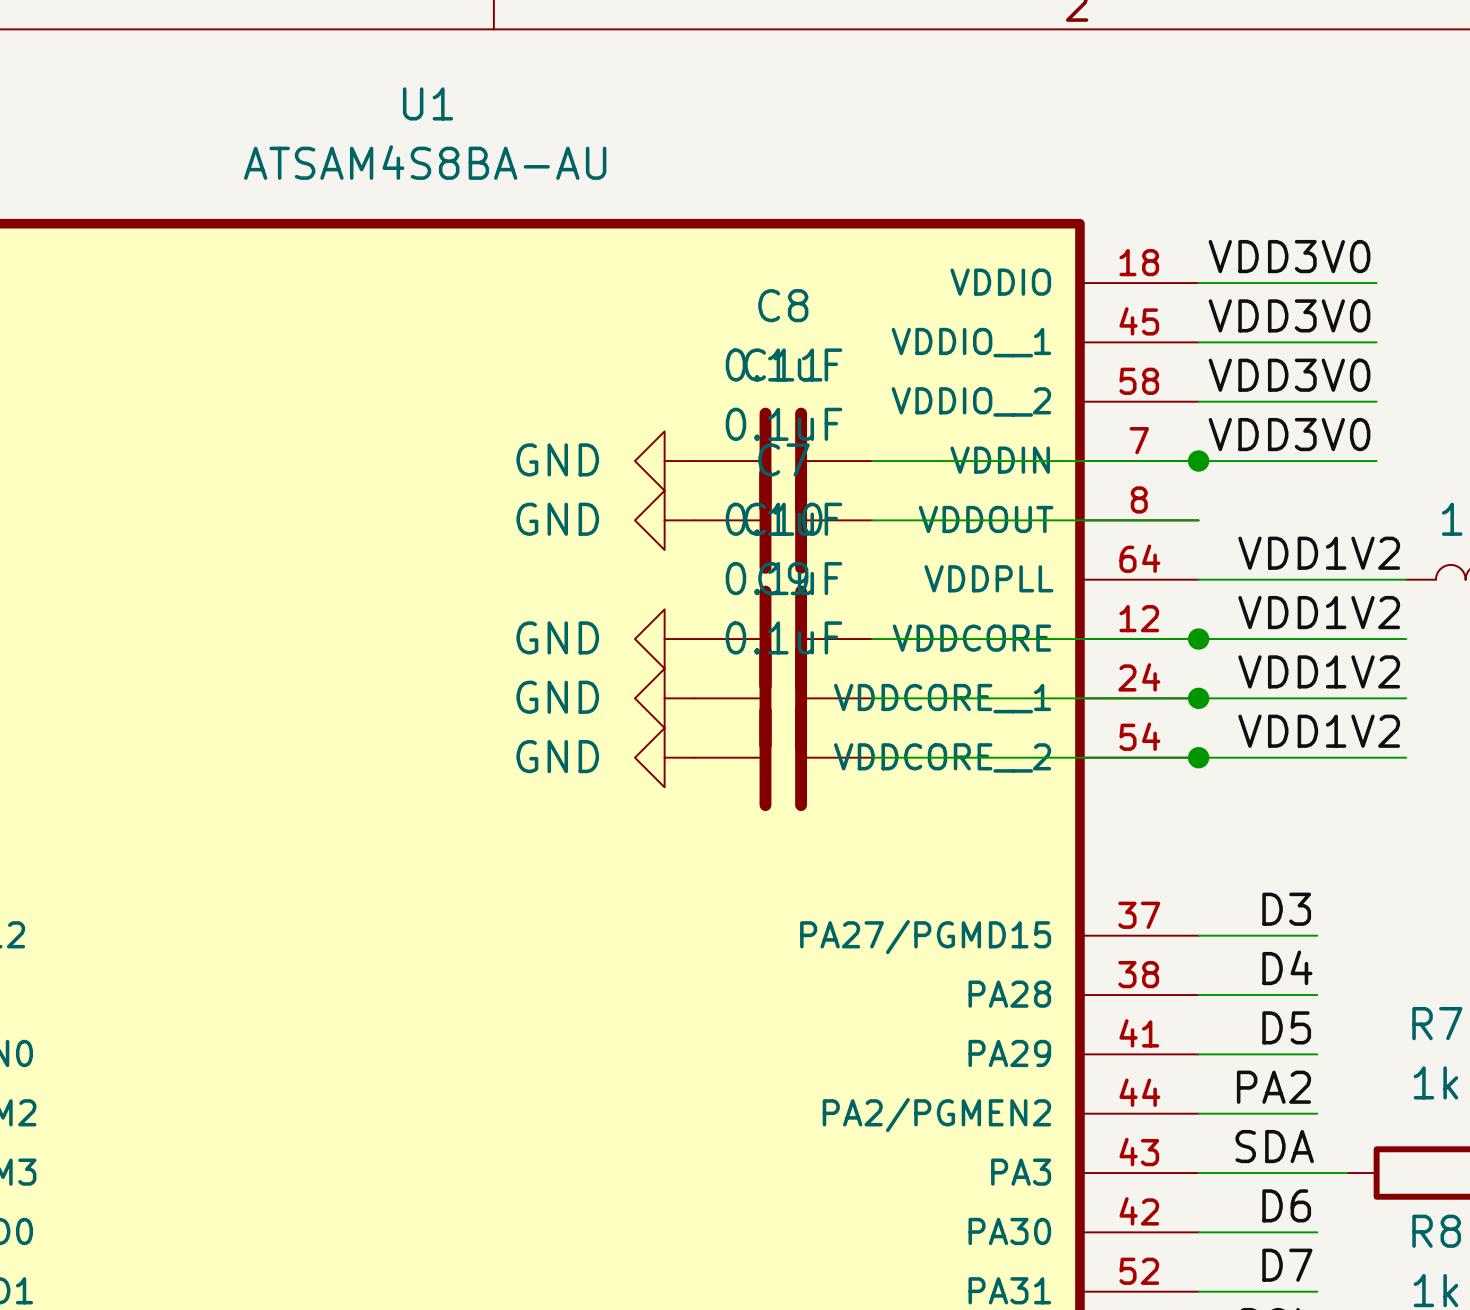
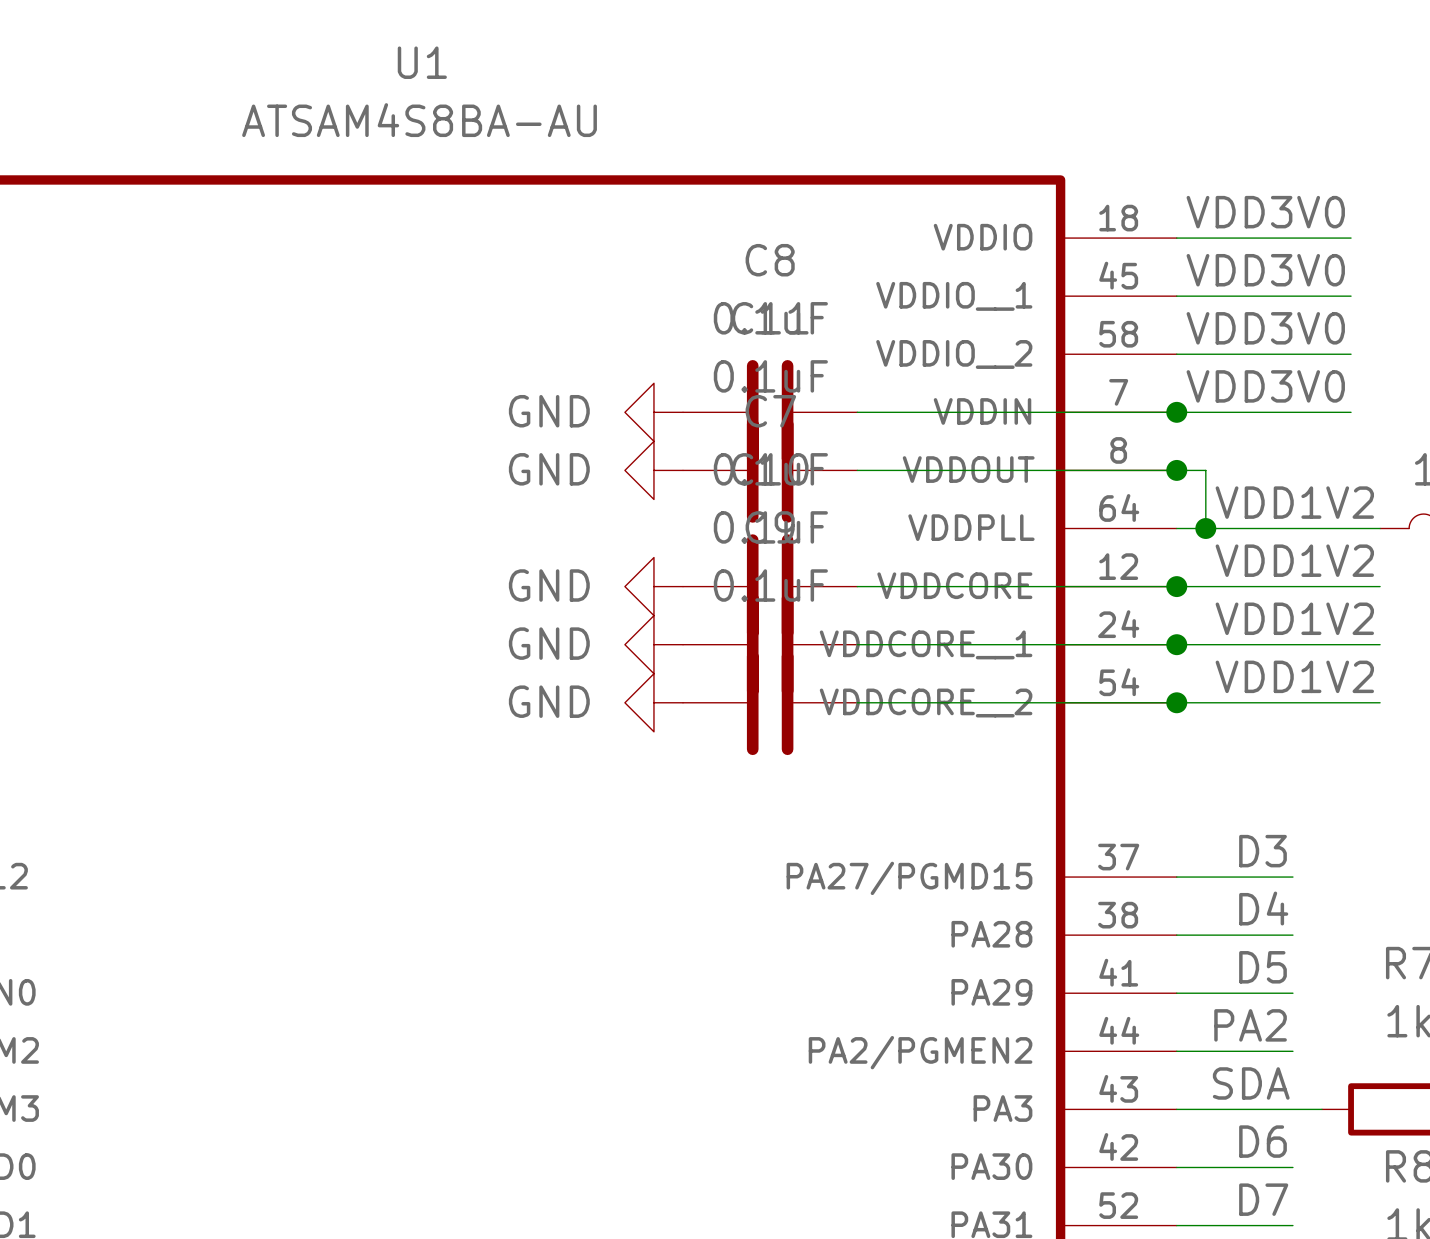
wire: none -> (1176, 470) (1205, 470) (1205, 528)
junction: none -> (1176, 470)
junction: none -> (1205, 528)

